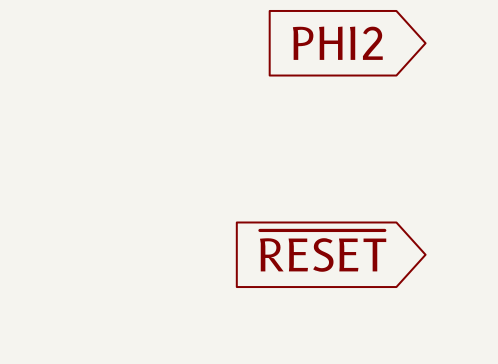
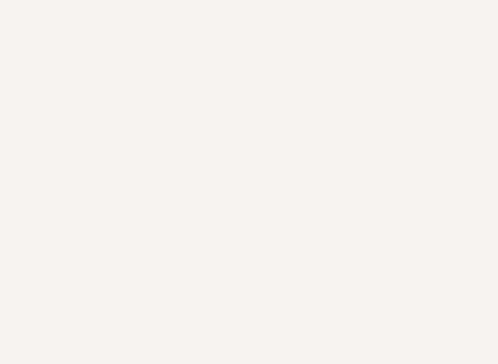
global label: PHI2 (337, 43) -> none
global label: ~{RESET} (323, 251) -> none

